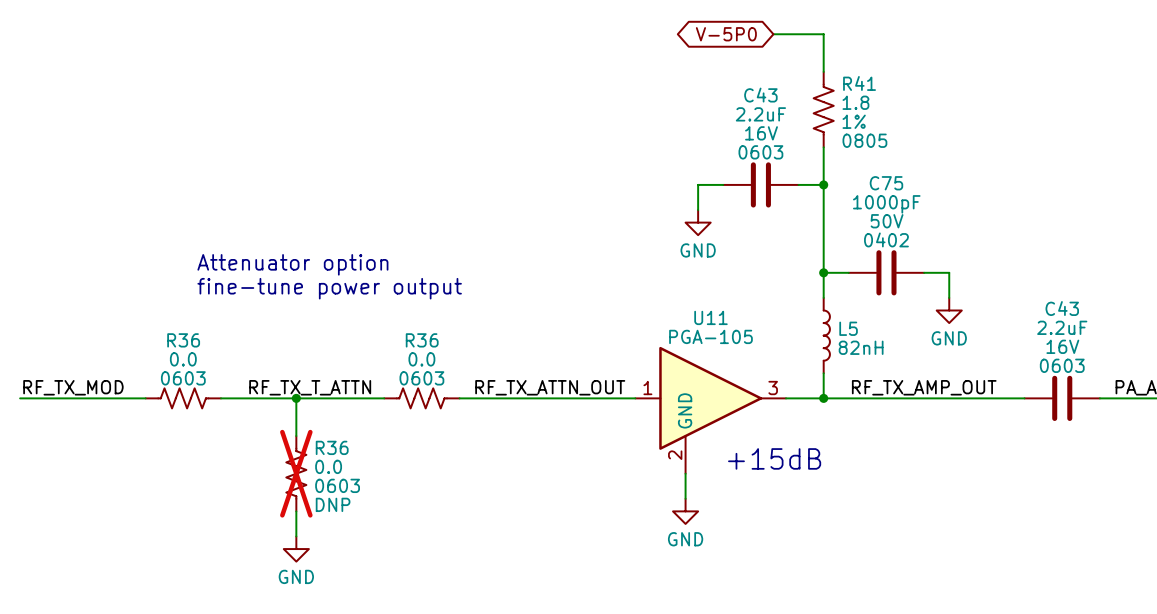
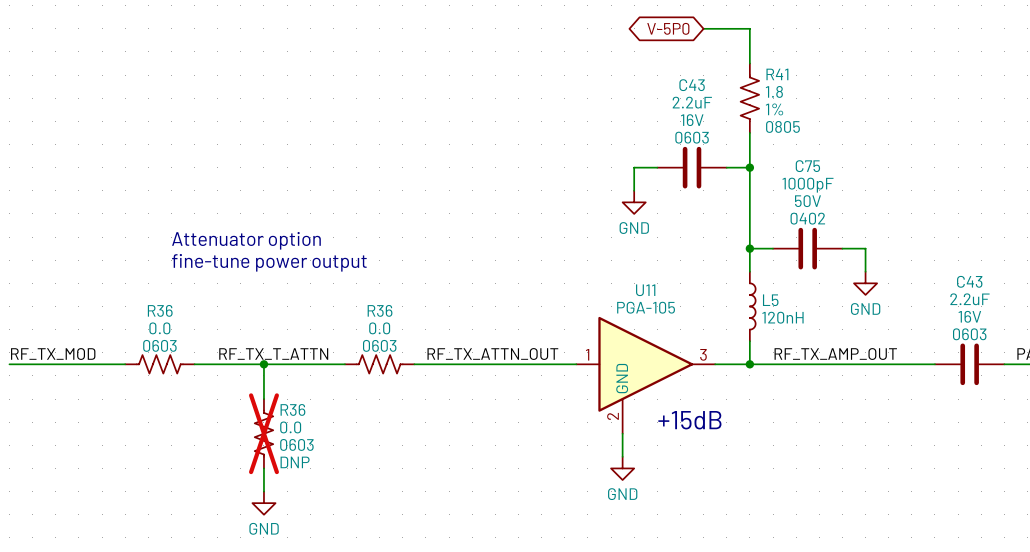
L5 value: 82nH (861, 347) -> 120nH (782, 317)

